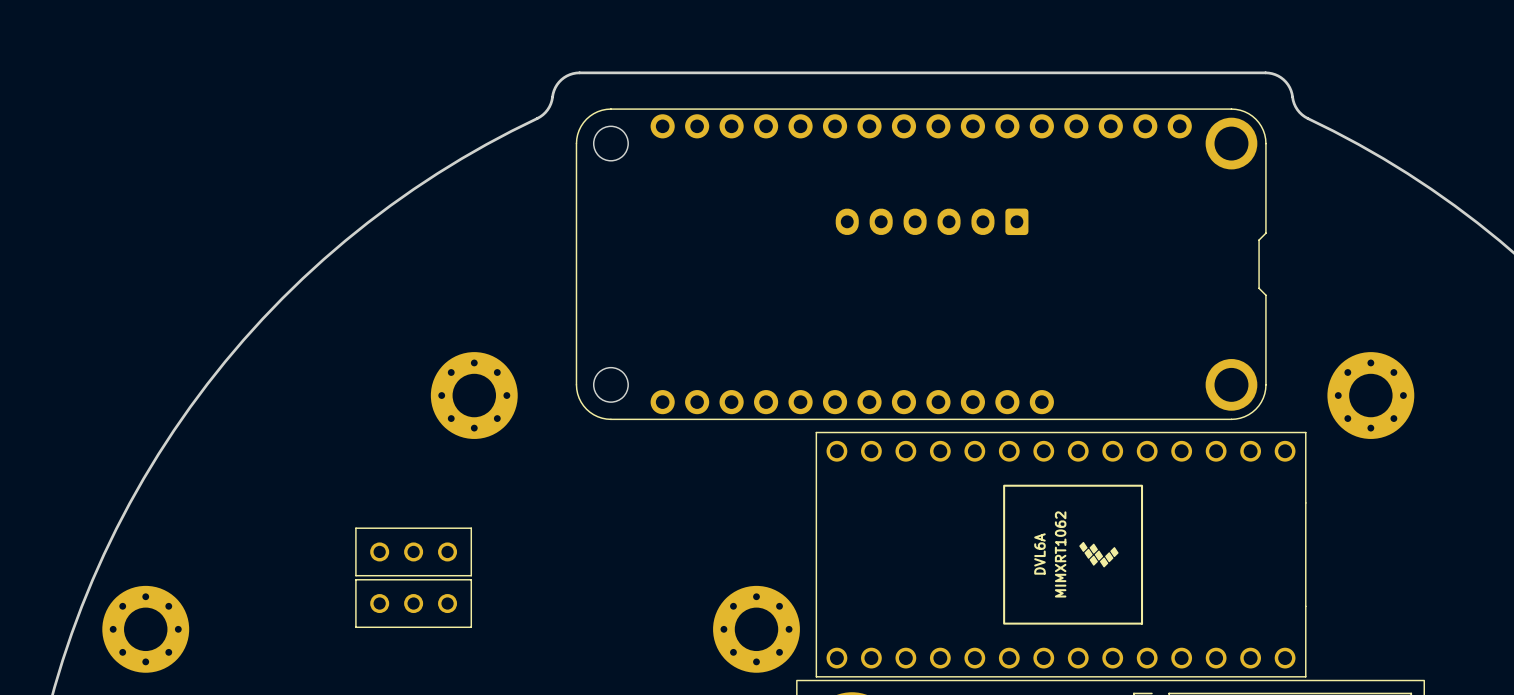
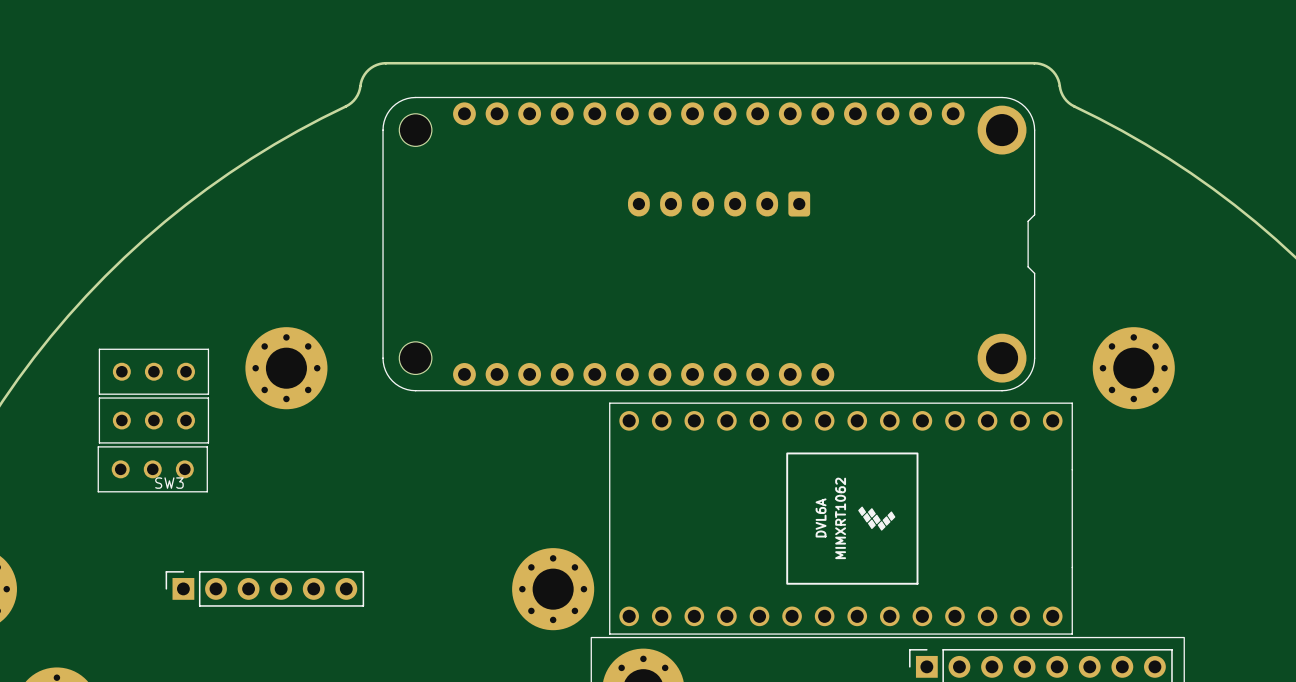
part: none -> (153, 371)
part: none -> (153, 420)
SW3: none -> (152, 469)
part: (413, 551) -> none
part: (413, 603) -> none
part: none -> (264, 588)

